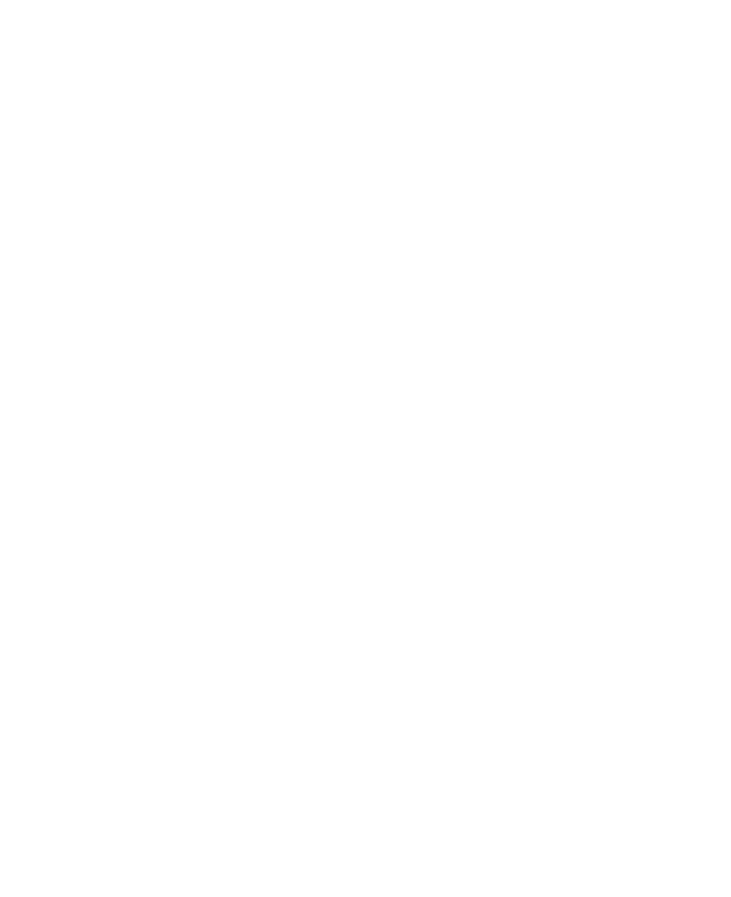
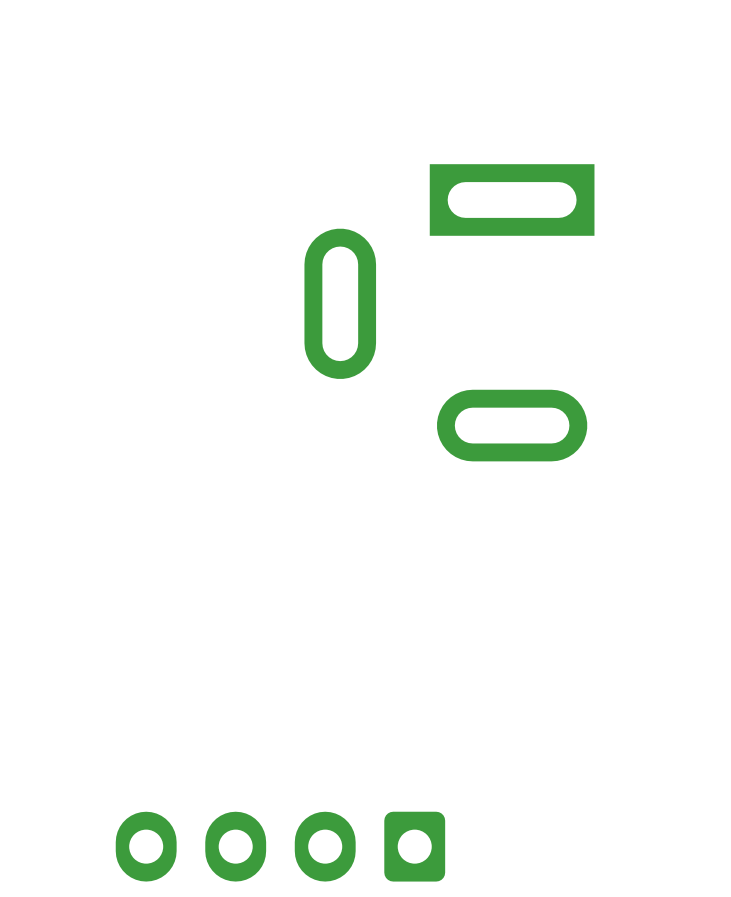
part: none -> (449, 312)
part: none -> (280, 846)

